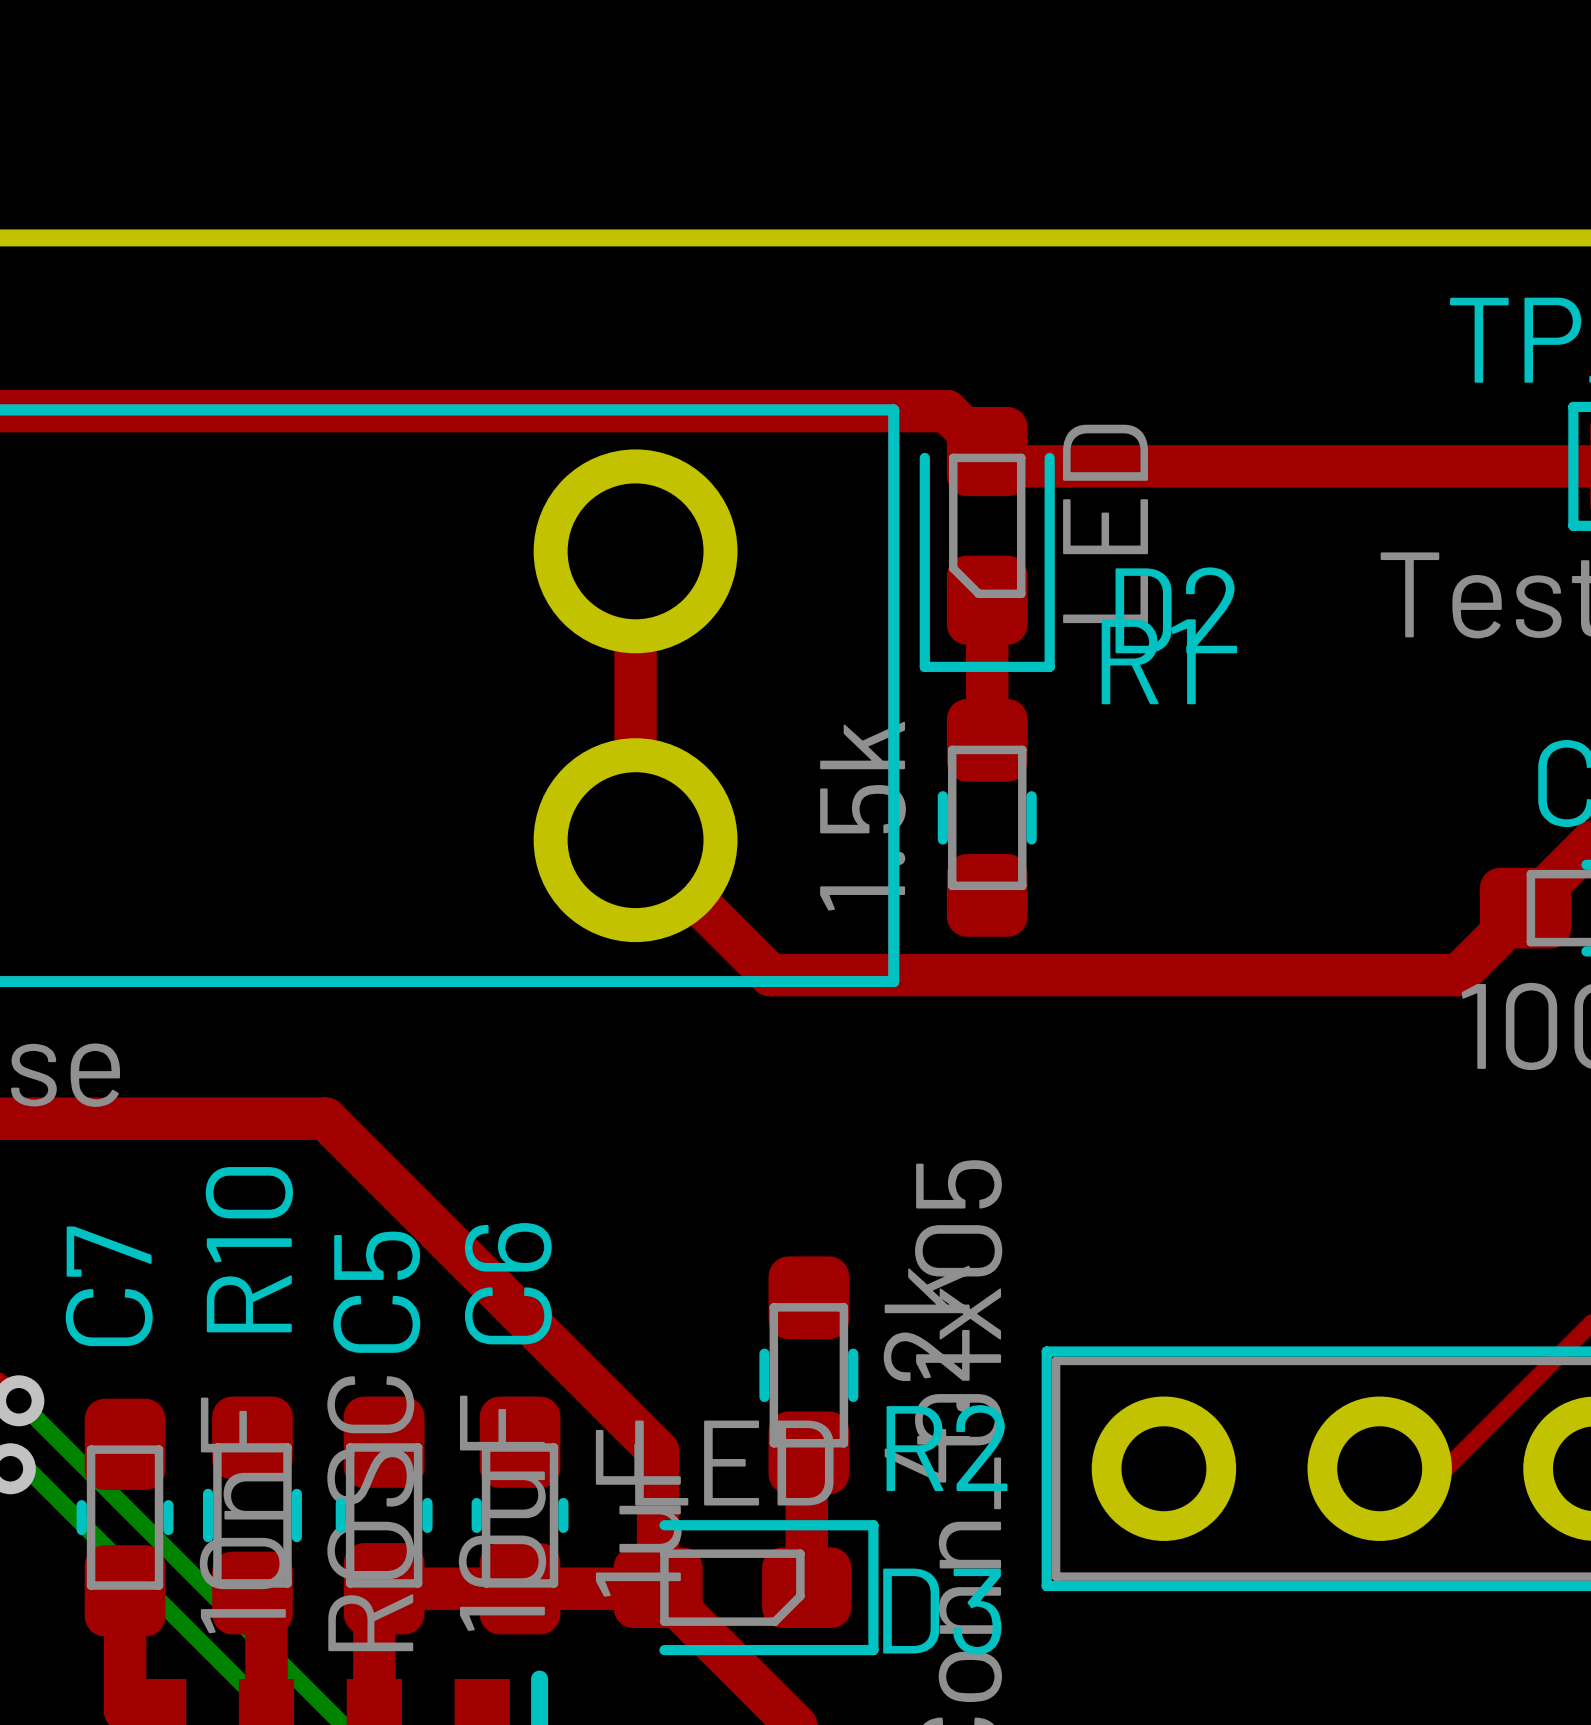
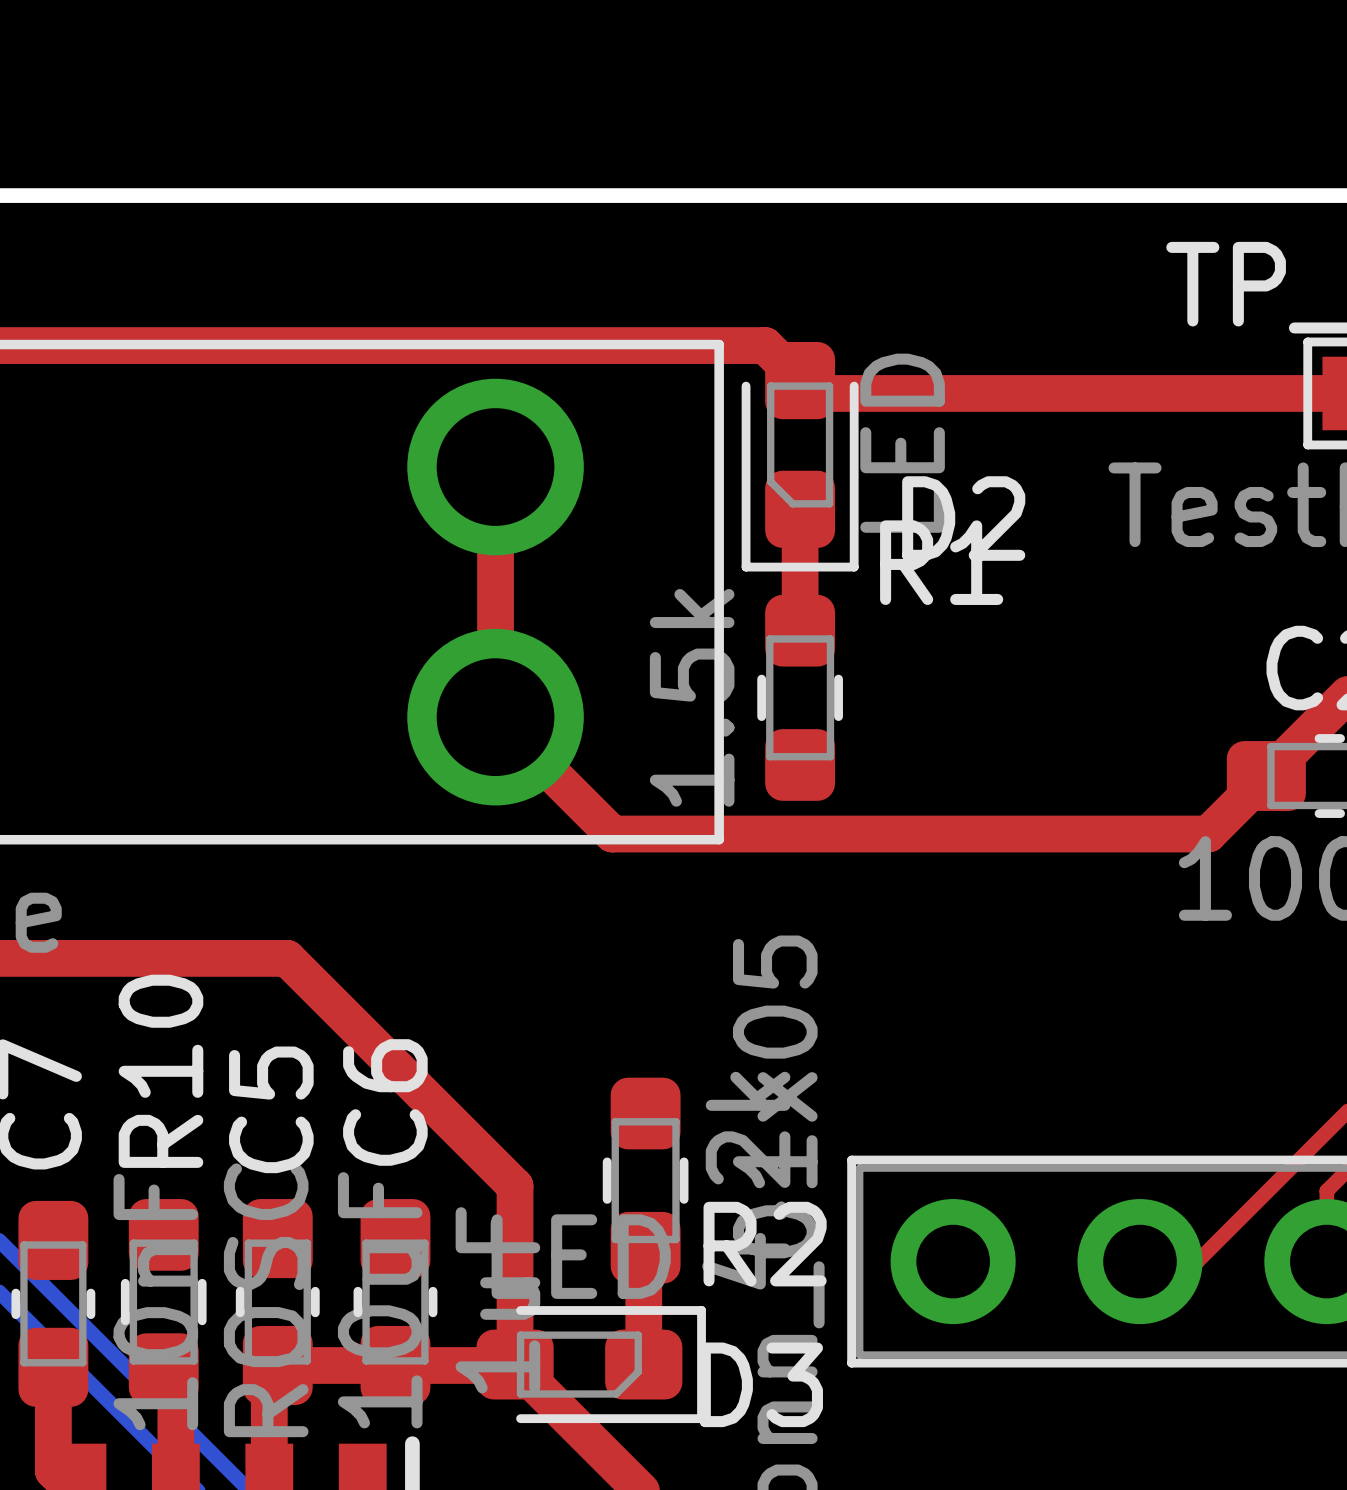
top track: (325, 1118) (658, 1451) -> (226, 958) (287, 958) (515, 1186) (515, 1246)

